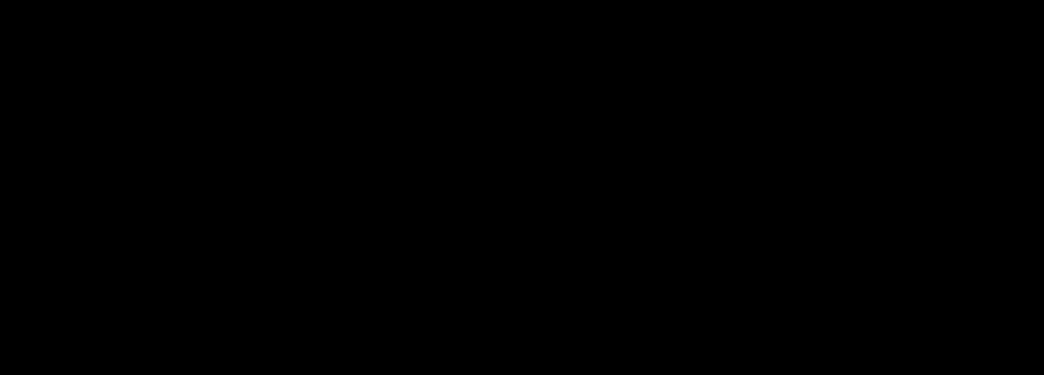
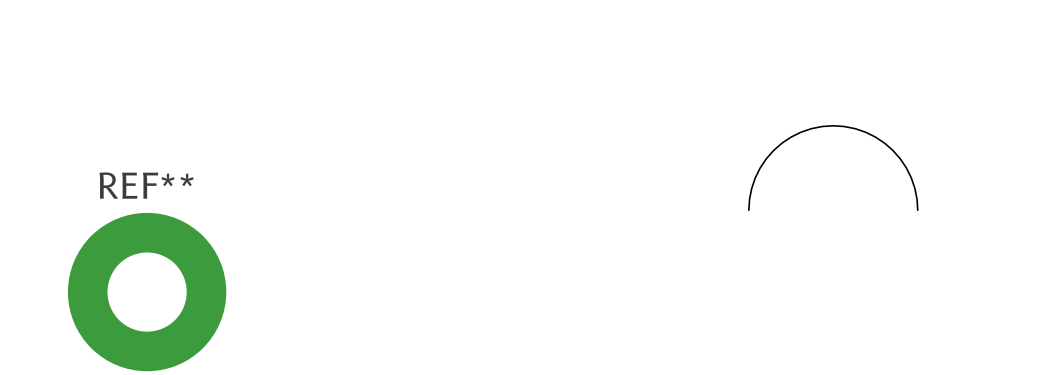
board edge: none -> (748, 210) (755, 177) (773, 150) (800, 132) (833, 125) (865, 132) (893, 150) (911, 177) (917, 210)
REF**: none -> (147, 292)

